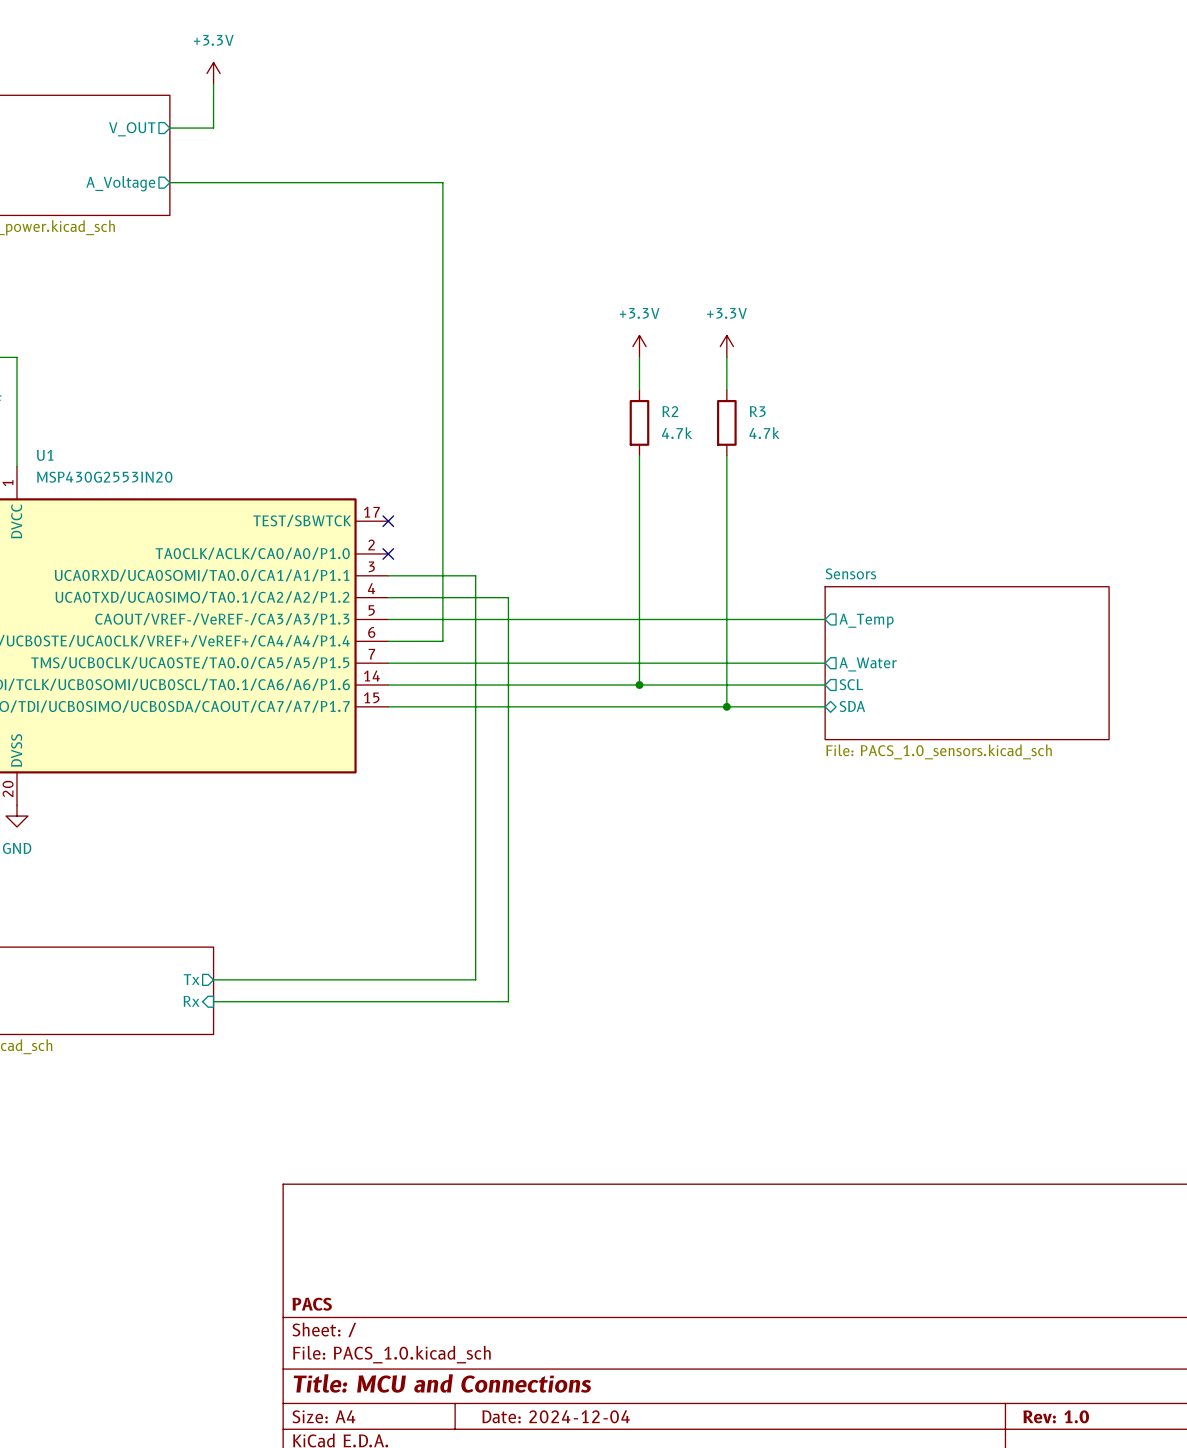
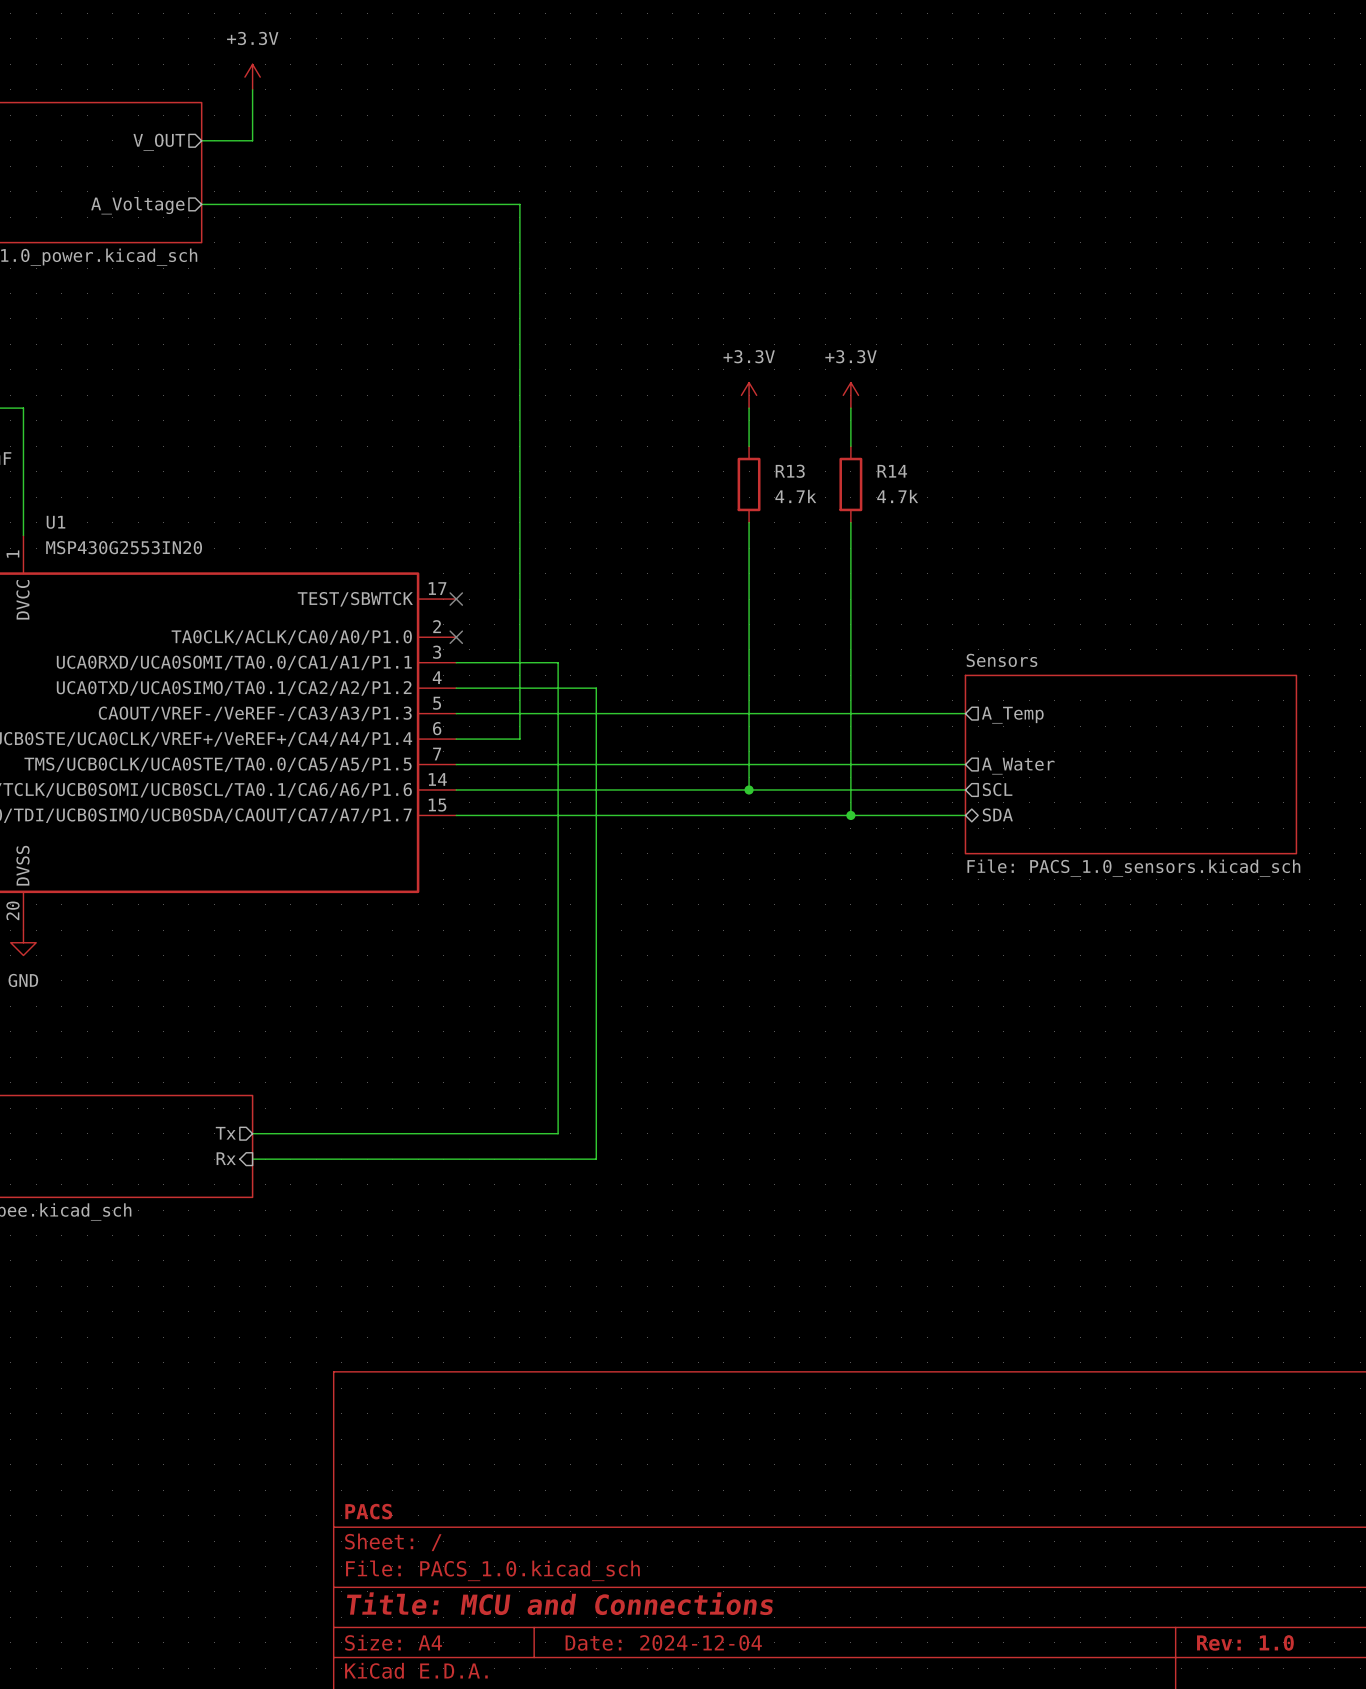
R2 name: R2 (670, 411) -> R13 (790, 471)
R3 name: R3 (757, 411) -> R14 (892, 471)

